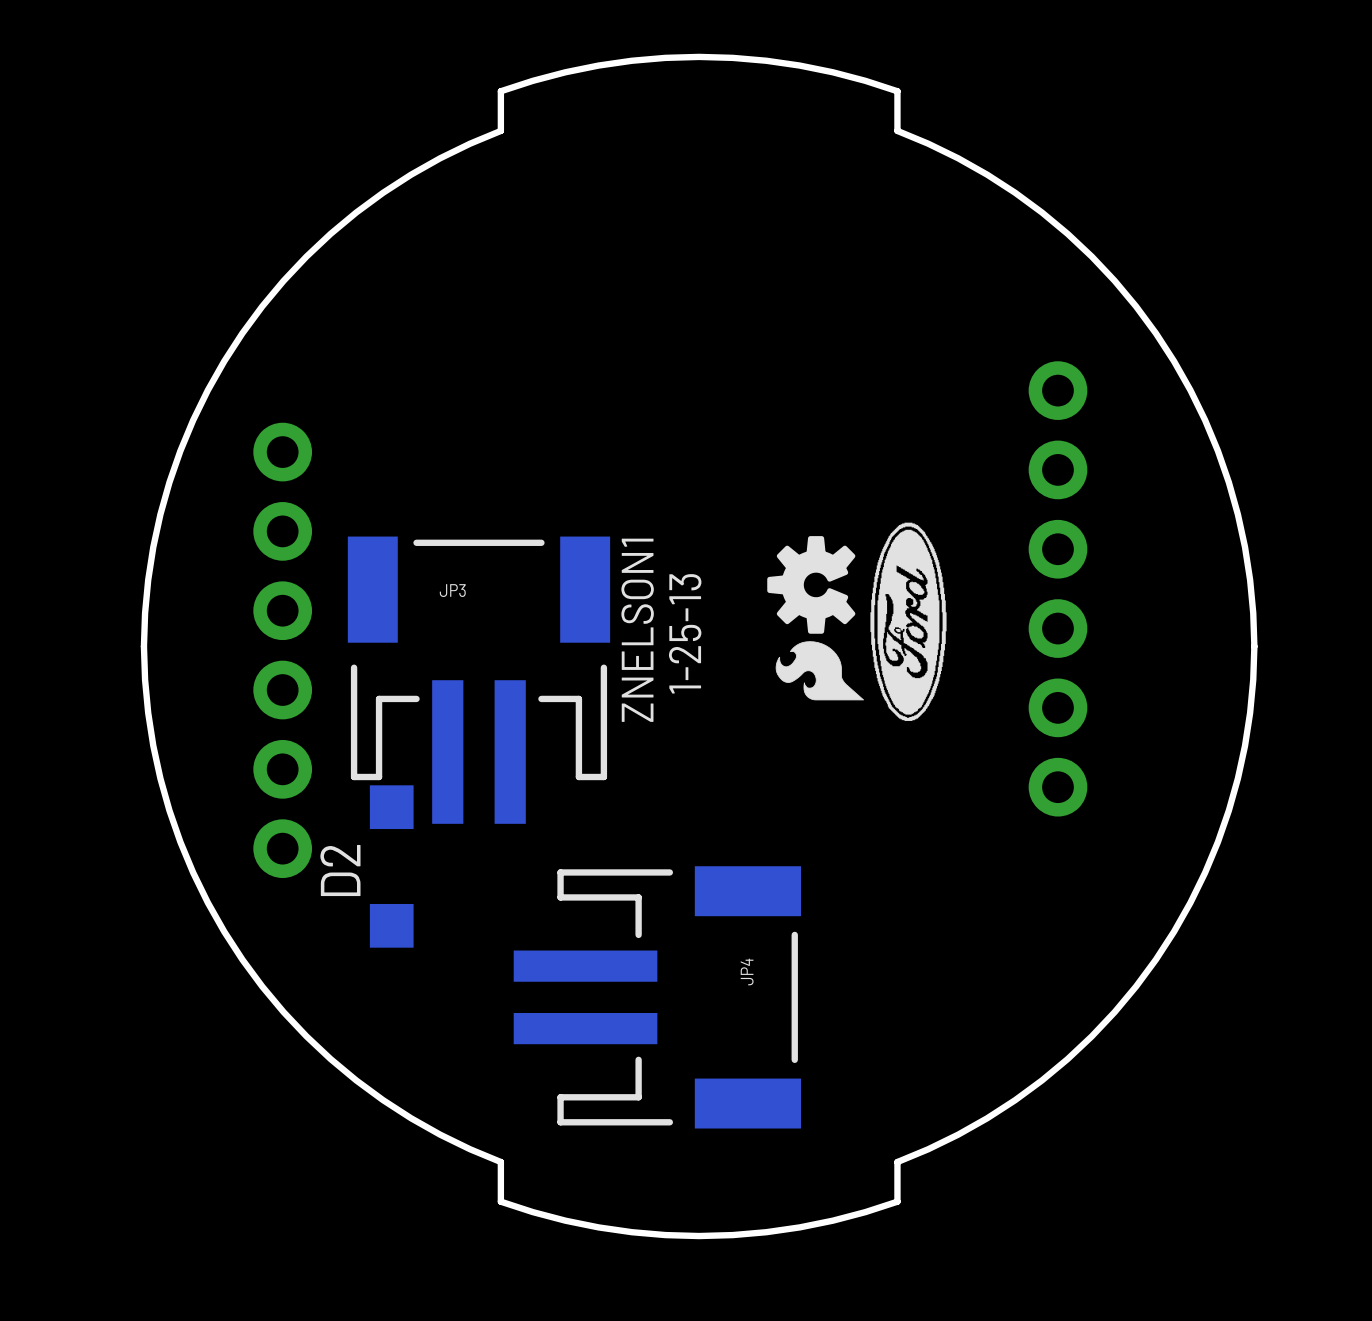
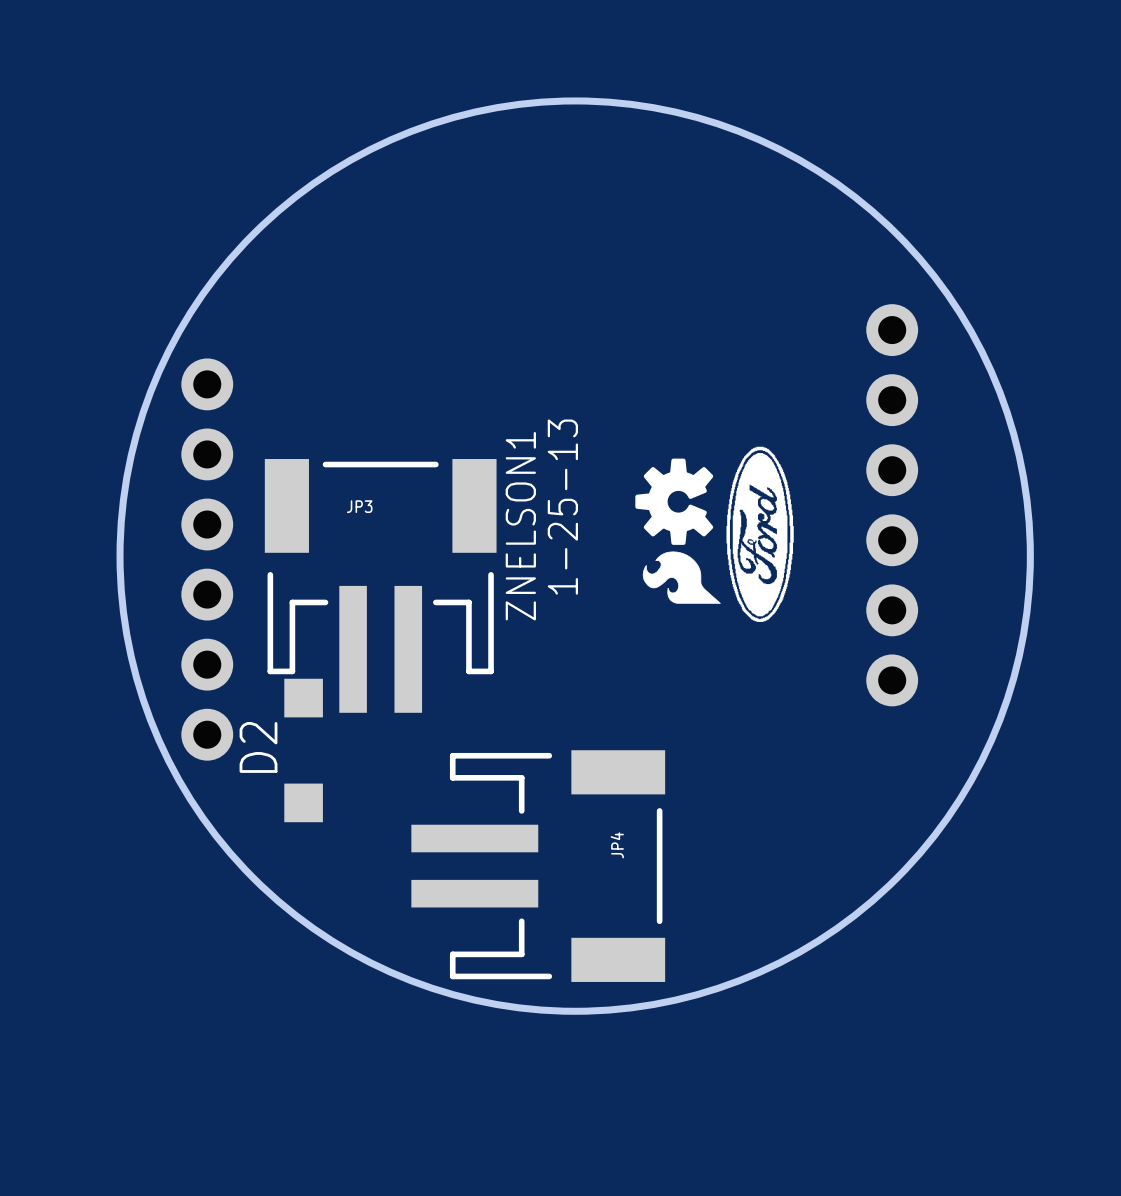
board edge: (897, 91) (897, 130) (958, 158) (1015, 192) (1067, 233) (1114, 280) (1155, 333) (1190, 390) (1205, 420) (1228, 482) (1245, 547) (1253, 613) (1254, 646) (1253, 679) (1245, 745) (1228, 810) (1217, 841) (1190, 902) (1174, 931) (1155, 959) (1114, 1012) (1067, 1059) (1015, 1100) (958, 1134) (897, 1162) (897, 1201) (832, 1220) (799, 1227) (732, 1235) (699, 1236) (665, 1235) (598, 1227) (565, 1220) (500, 1201) (500, 1162) (440, 1134) (383, 1100) (330, 1059) (283, 1012) (242, 959) (207, 902) (193, 872) (169, 810) (153, 745) (145, 679) (143, 646) (145, 613) (153, 547) (169, 482) (180, 450) (207, 390) (224, 361) (242, 333) (283, 280) (330, 233) (383, 192) (440, 158) (500, 130) (500, 91) (565, 72) (598, 65) (665, 57) (699, 56) (732, 57) (799, 65) (832, 72) (897, 91) -> none
round board edge: none -> [116, 97, 1034, 1015]

